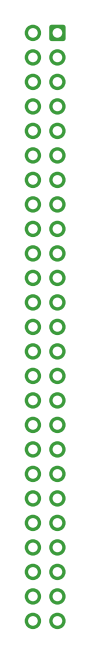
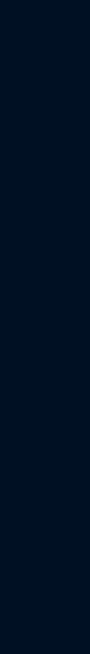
part: (45, 326) -> none

